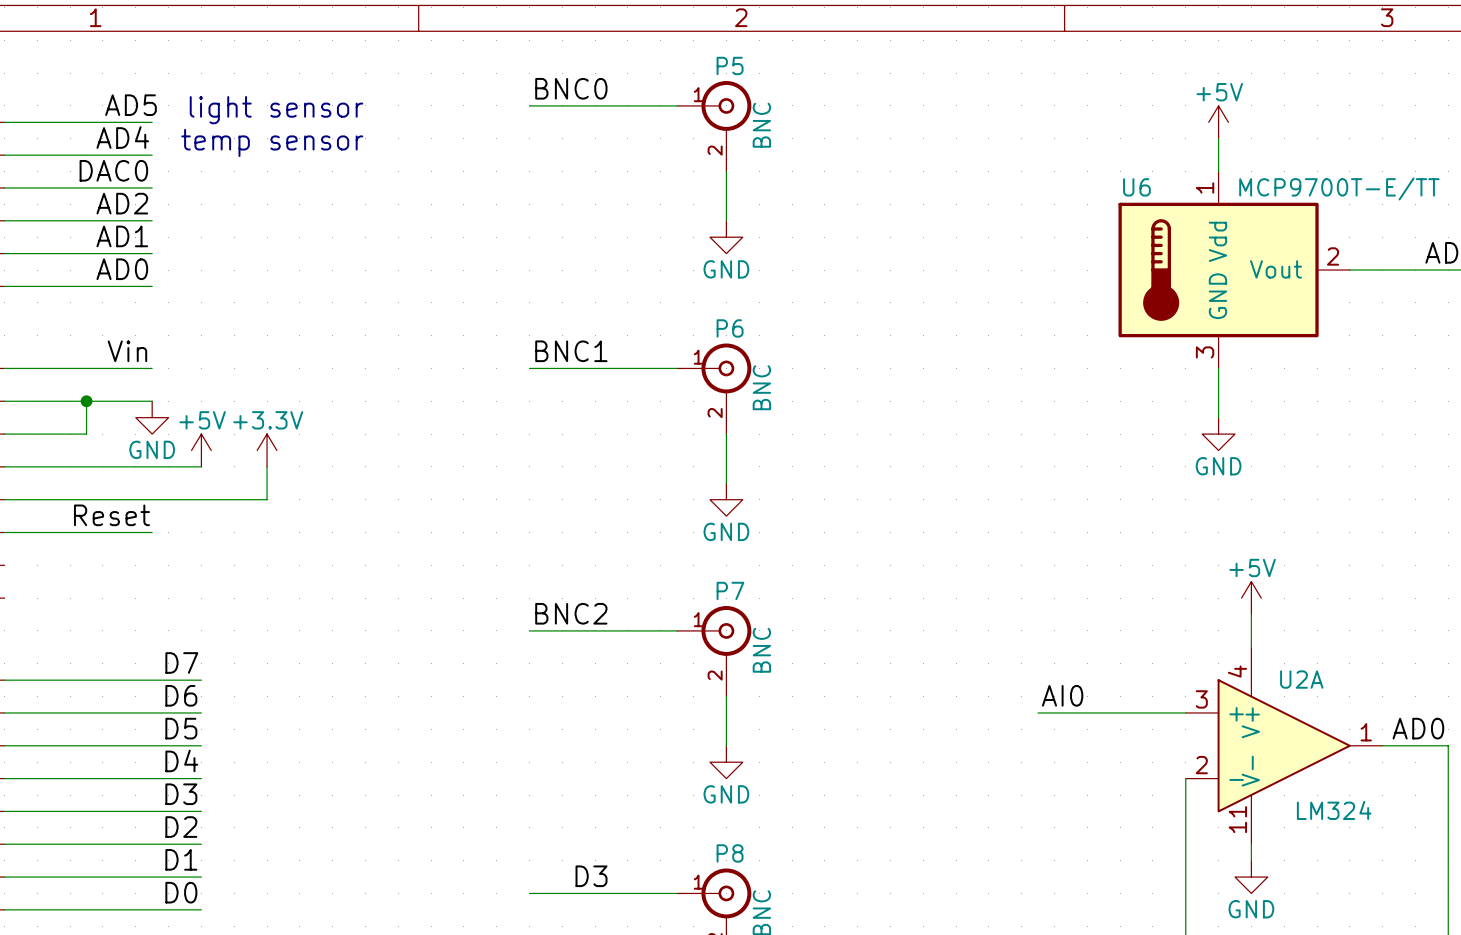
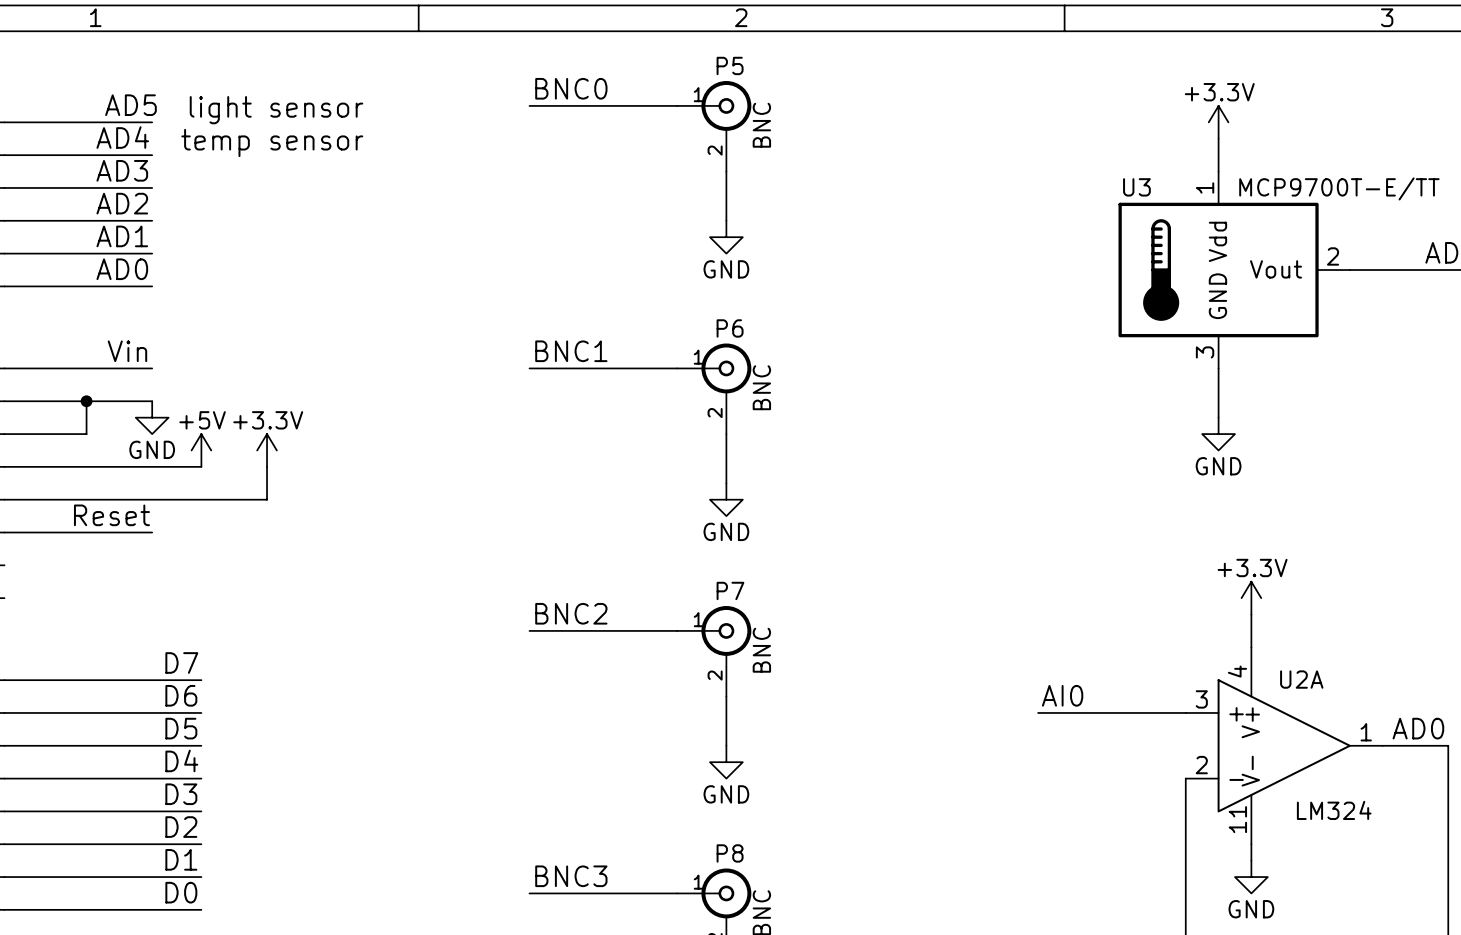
power symbol: +5V (1218, 122) -> +3.3V (1218, 122)
label: DAC0 (113, 170) -> AD3 (122, 170)
U6 name: U6 (1136, 187) -> U3 (1136, 187)
power symbol: +5V (1251, 598) -> +3.3V (1251, 598)
label: D3 (591, 876) -> BNC3 (571, 876)

